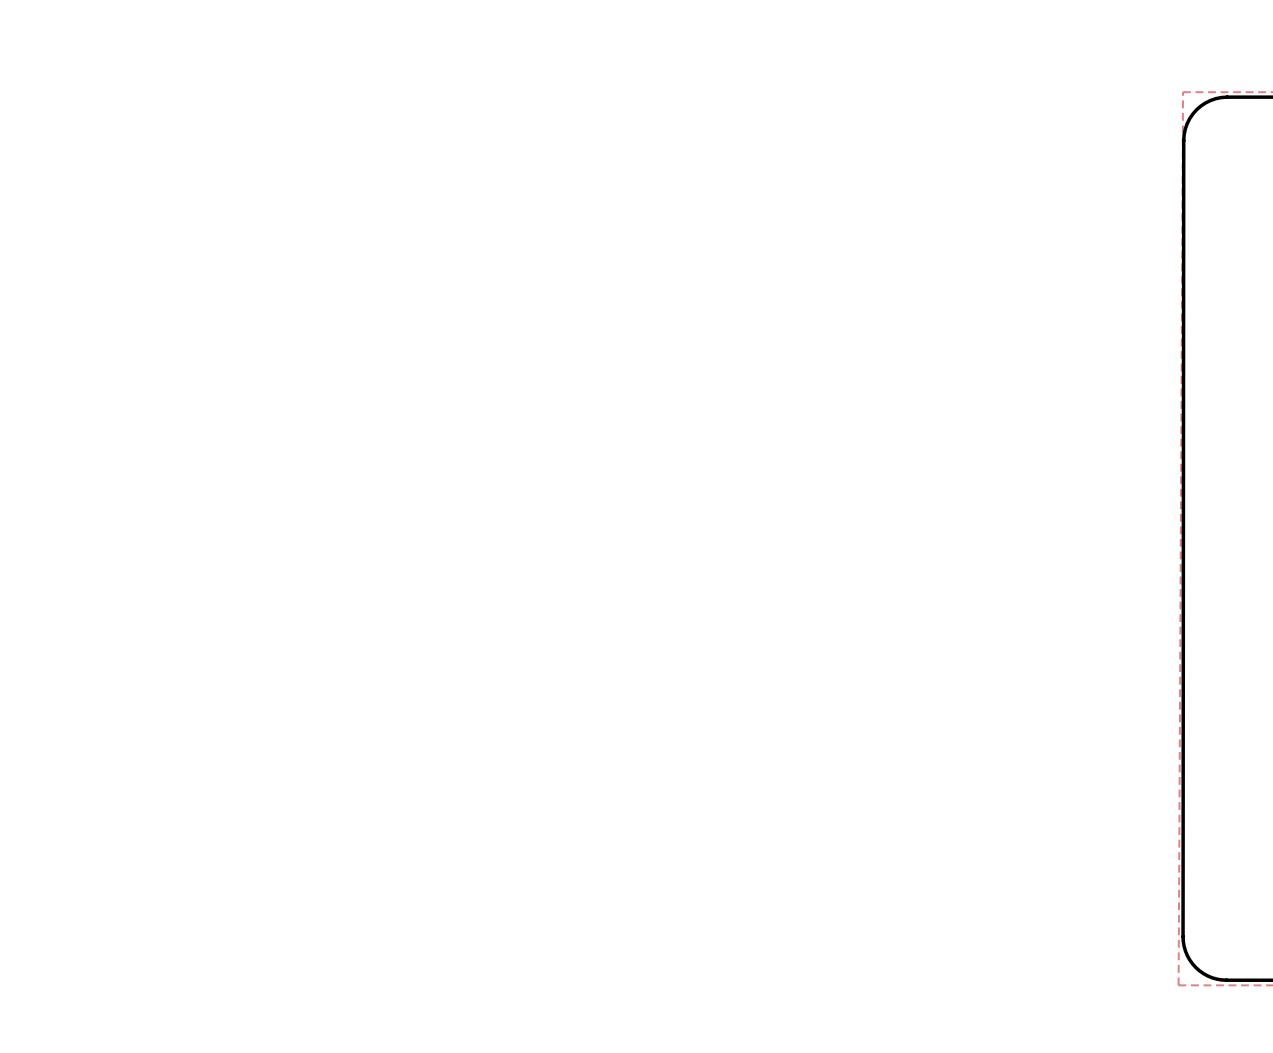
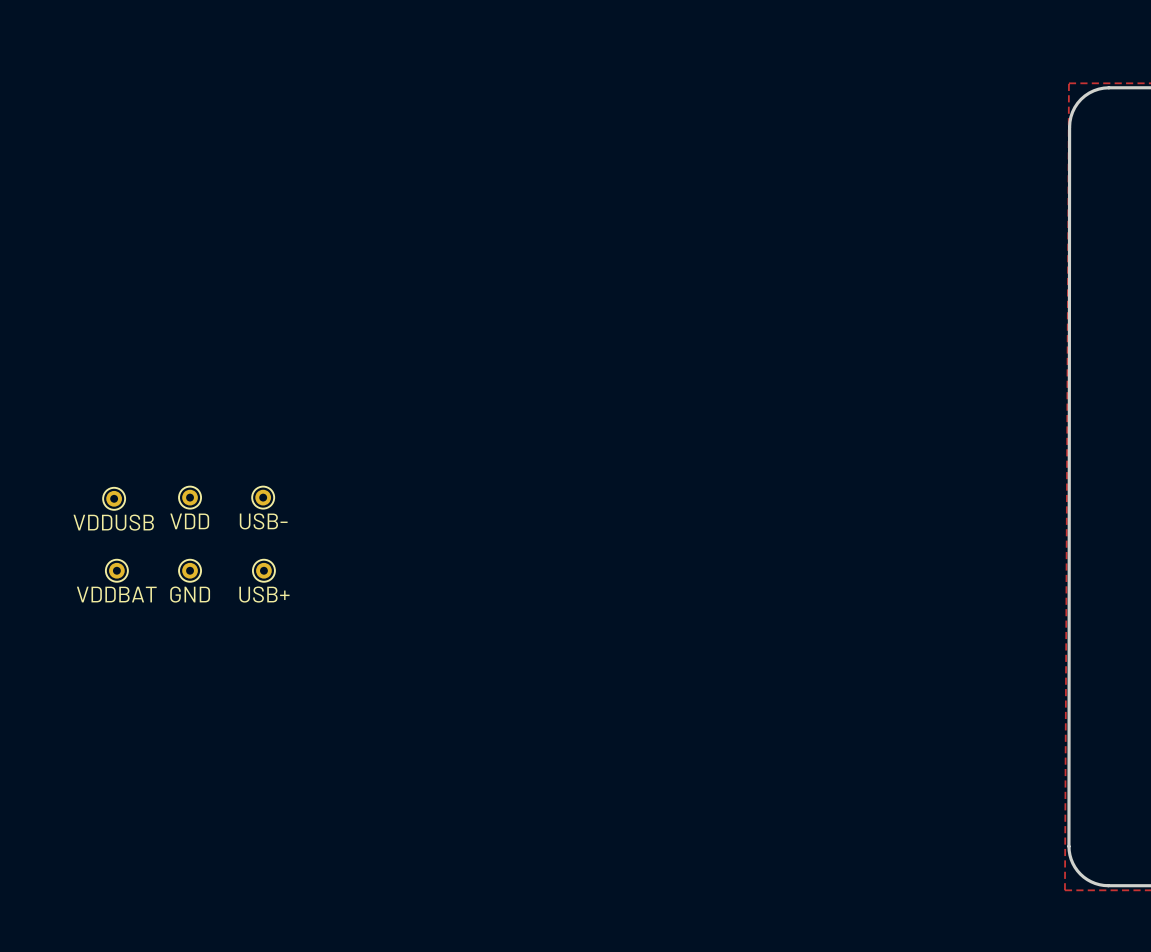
part: none -> VDD (190, 497)
part: none -> USB- (263, 497)
part: none -> VDDUSB (114, 498)
part: none -> VDDBAT (116, 570)
part: none -> GND (190, 570)
part: none -> USB+ (263, 570)

